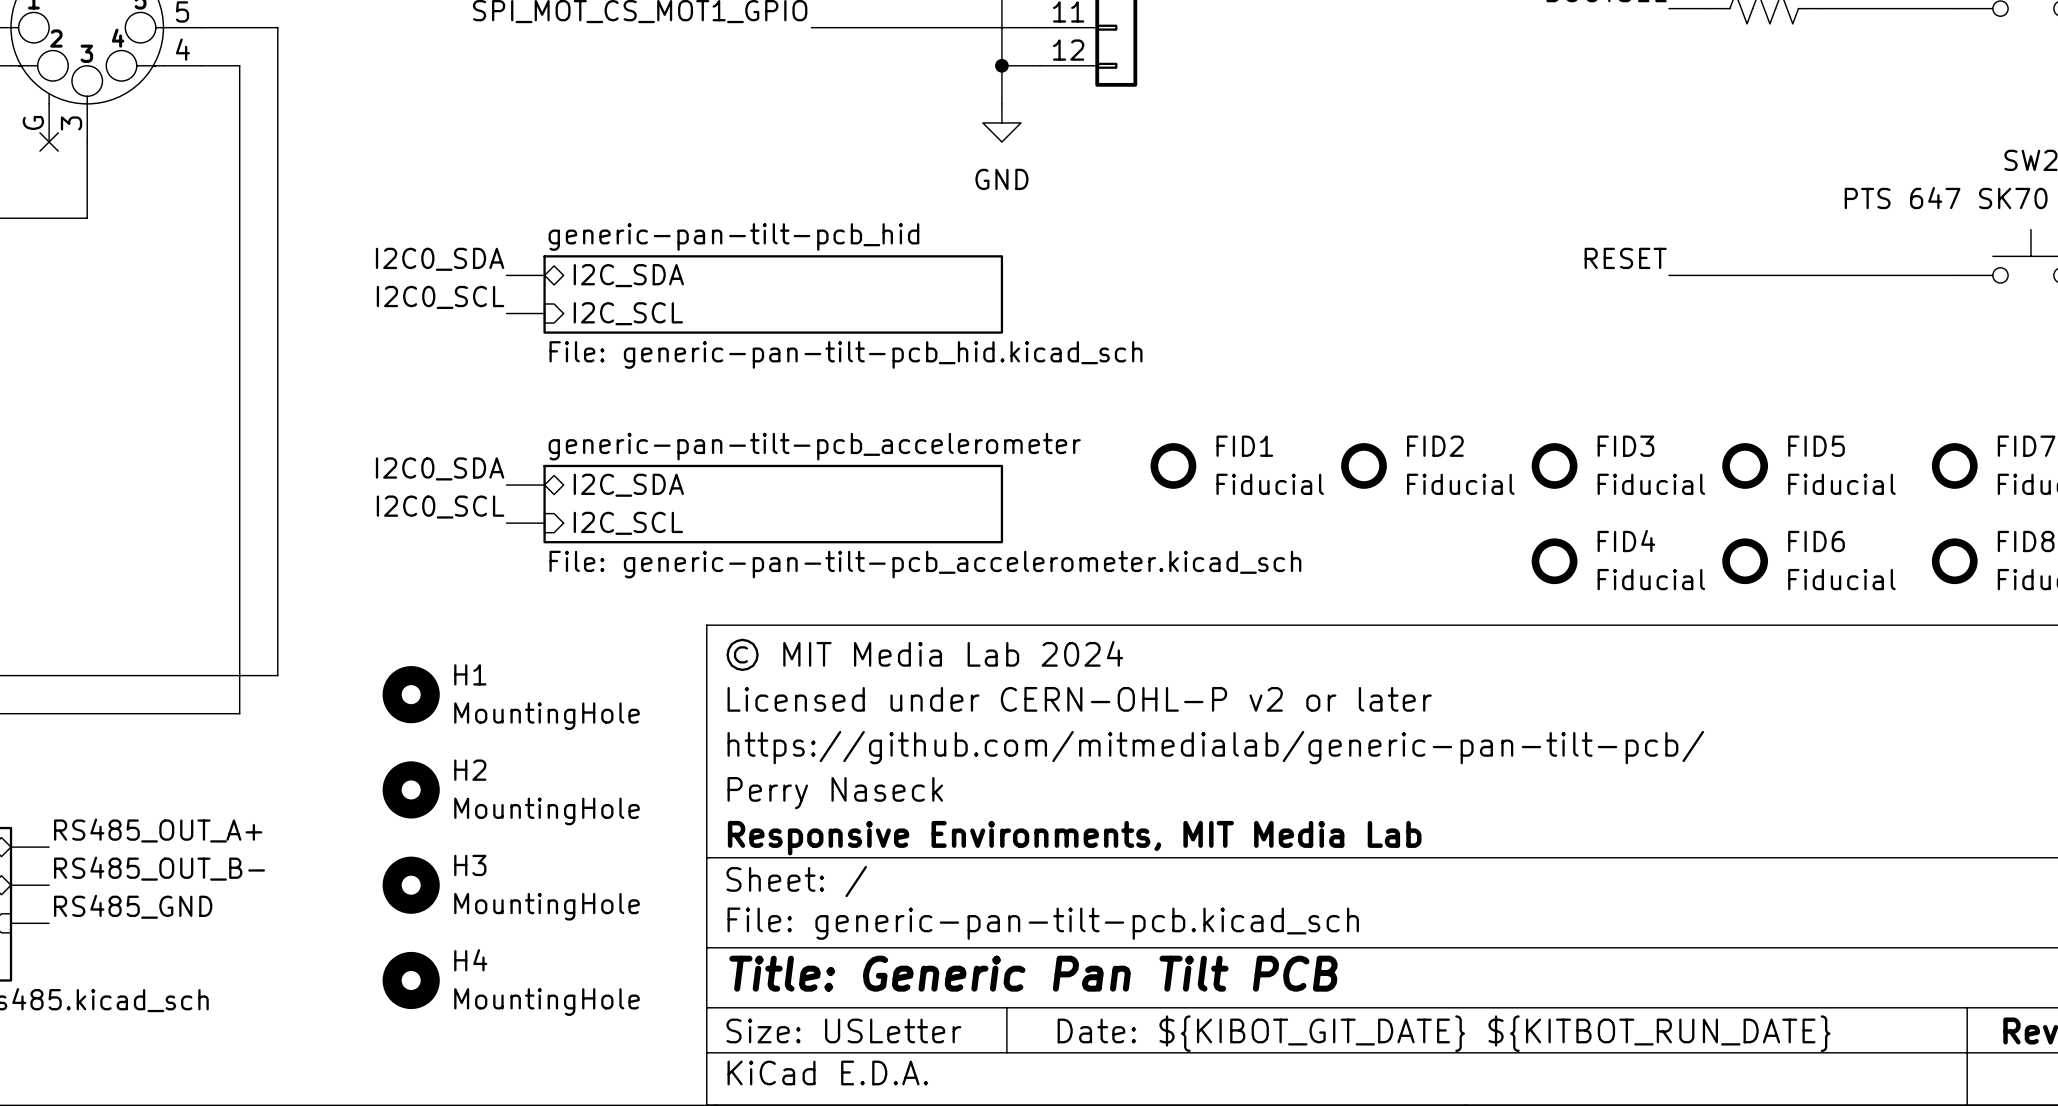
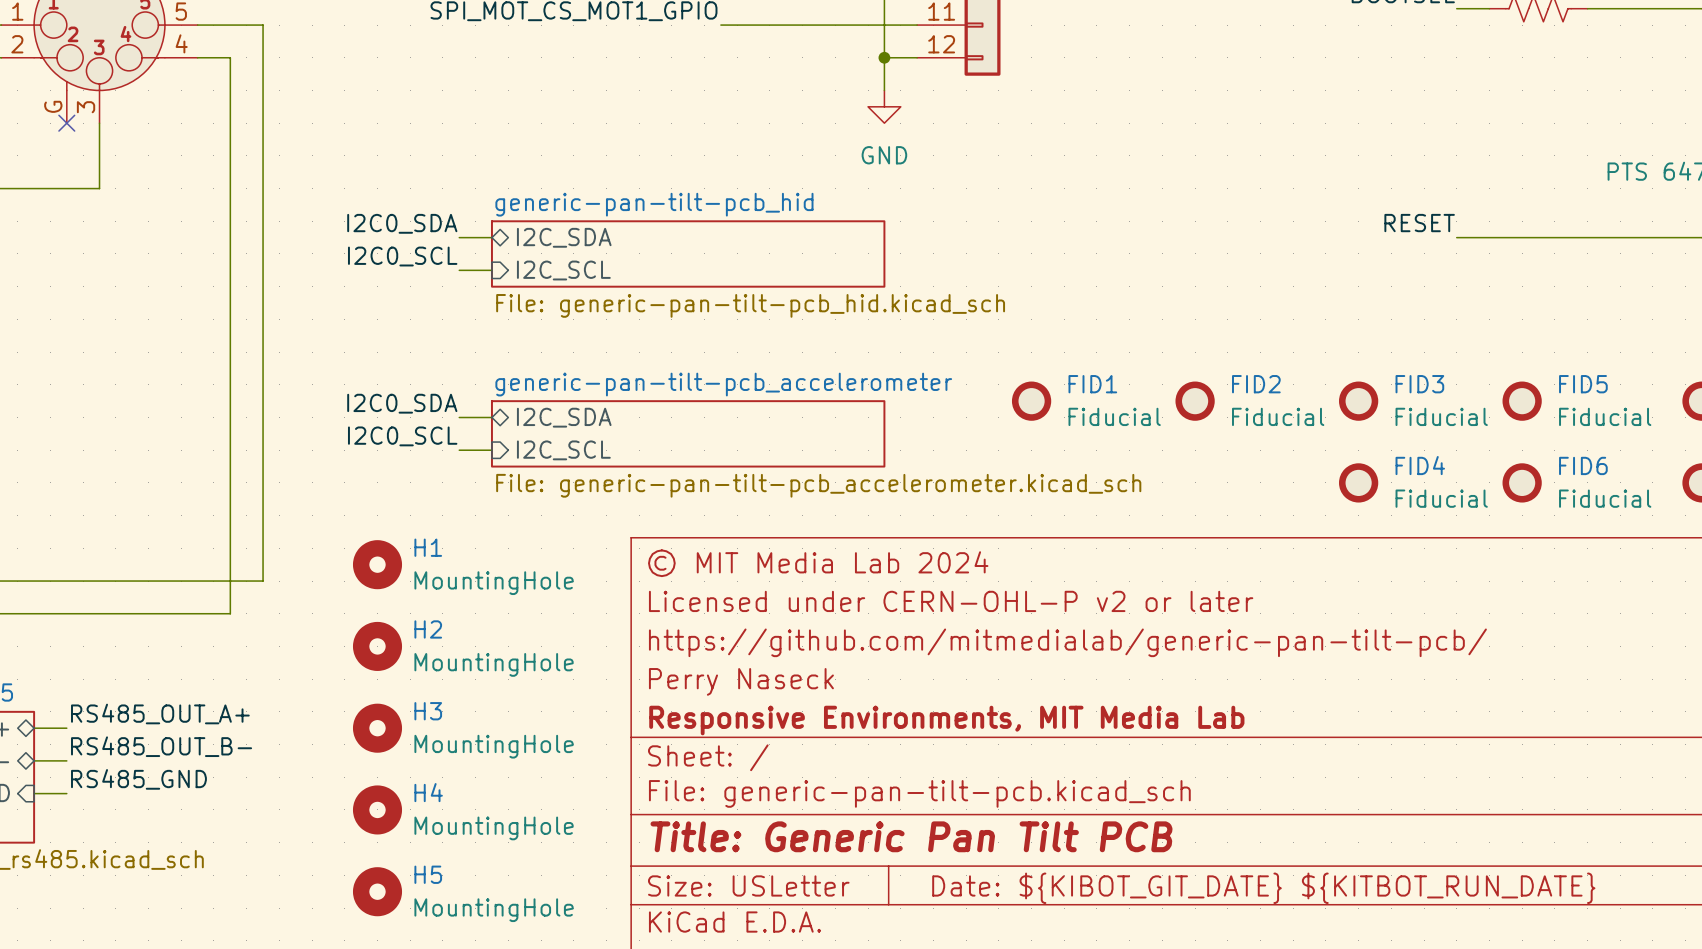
H1 position: (411, 694) -> (377, 564)
H2 position: (411, 789) -> (377, 646)
H3 position: (411, 885) -> (377, 728)
H4 position: (411, 980) -> (377, 809)
H5: none -> MountingHole (377, 891)

